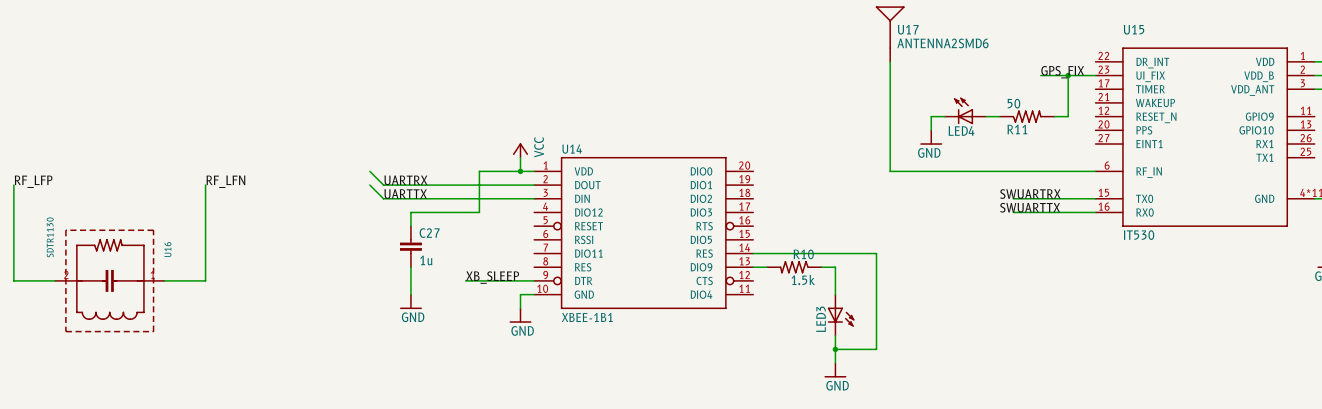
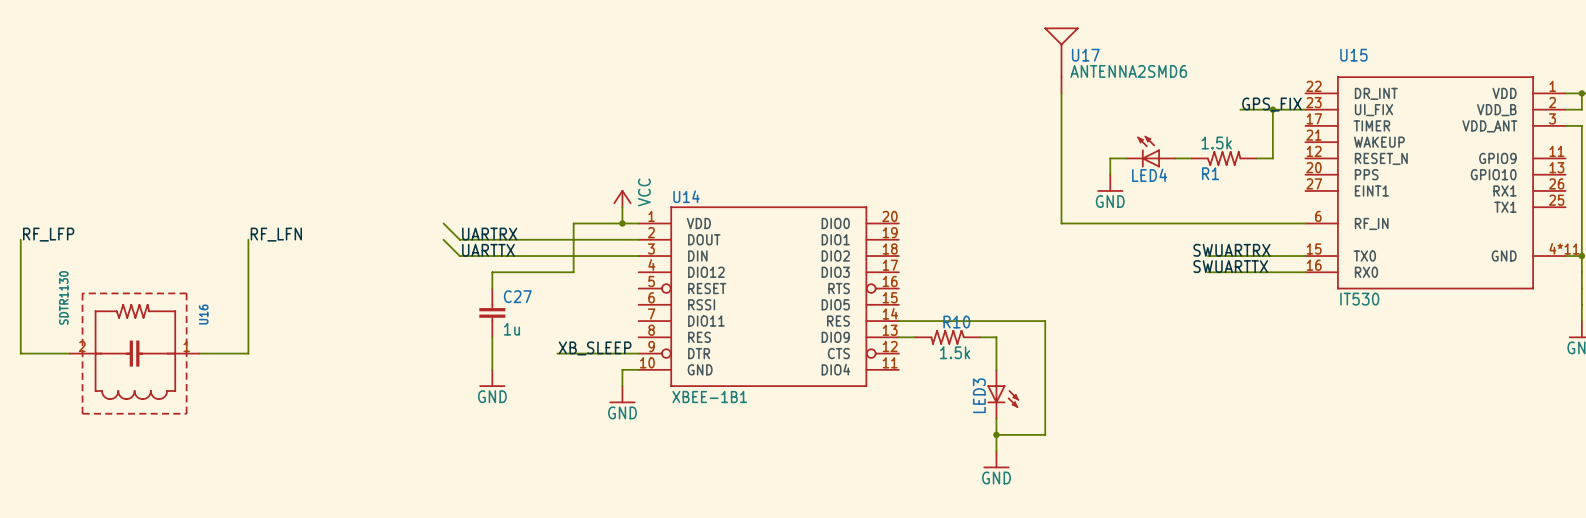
R11 value: 50 (1013, 103) -> 1.5k (1216, 143)
R11 name: R11 (1017, 129) -> R1 (1210, 173)

